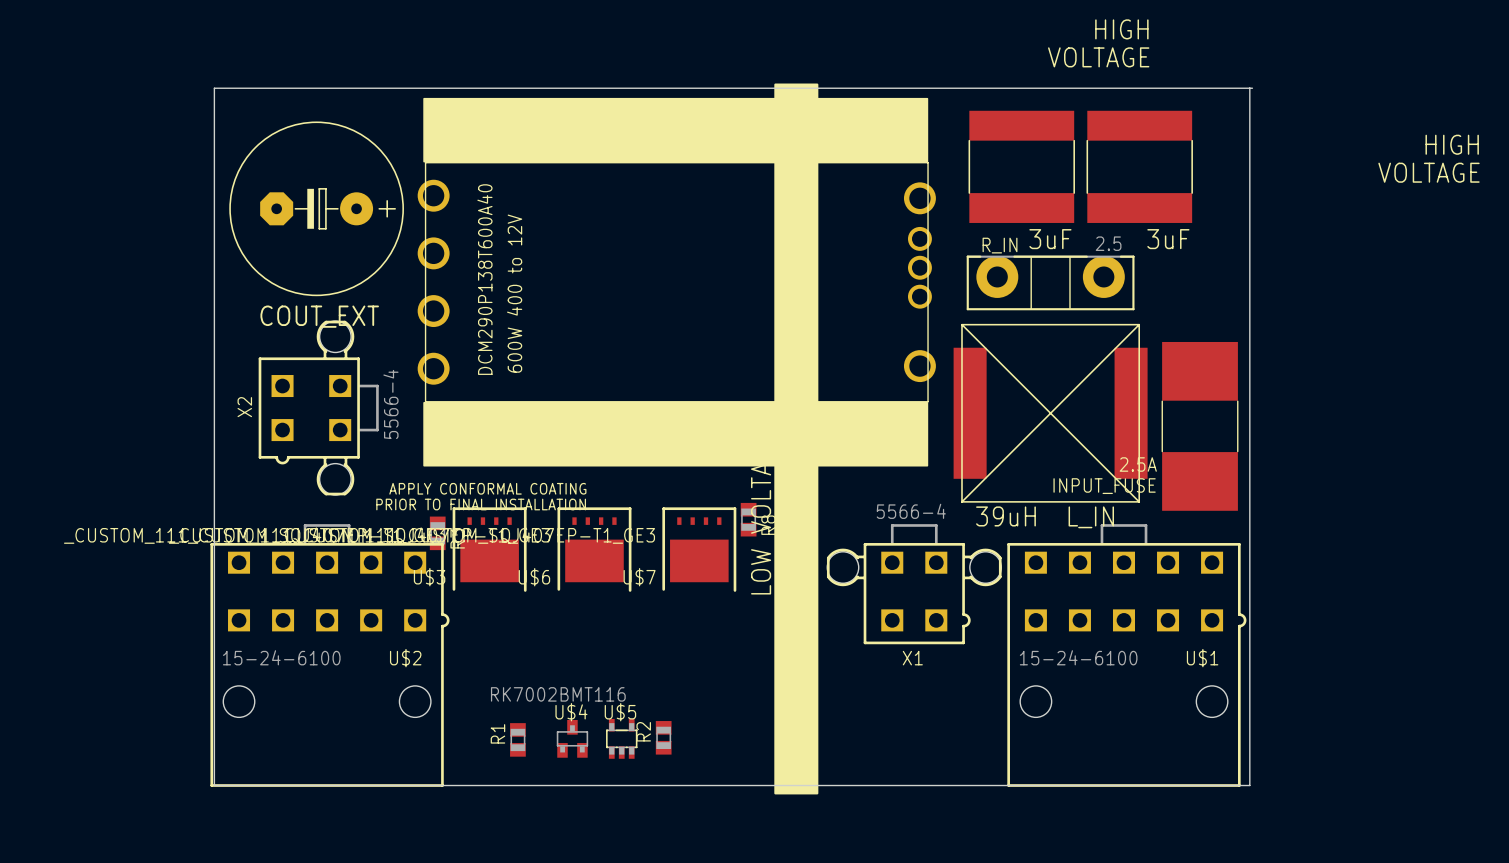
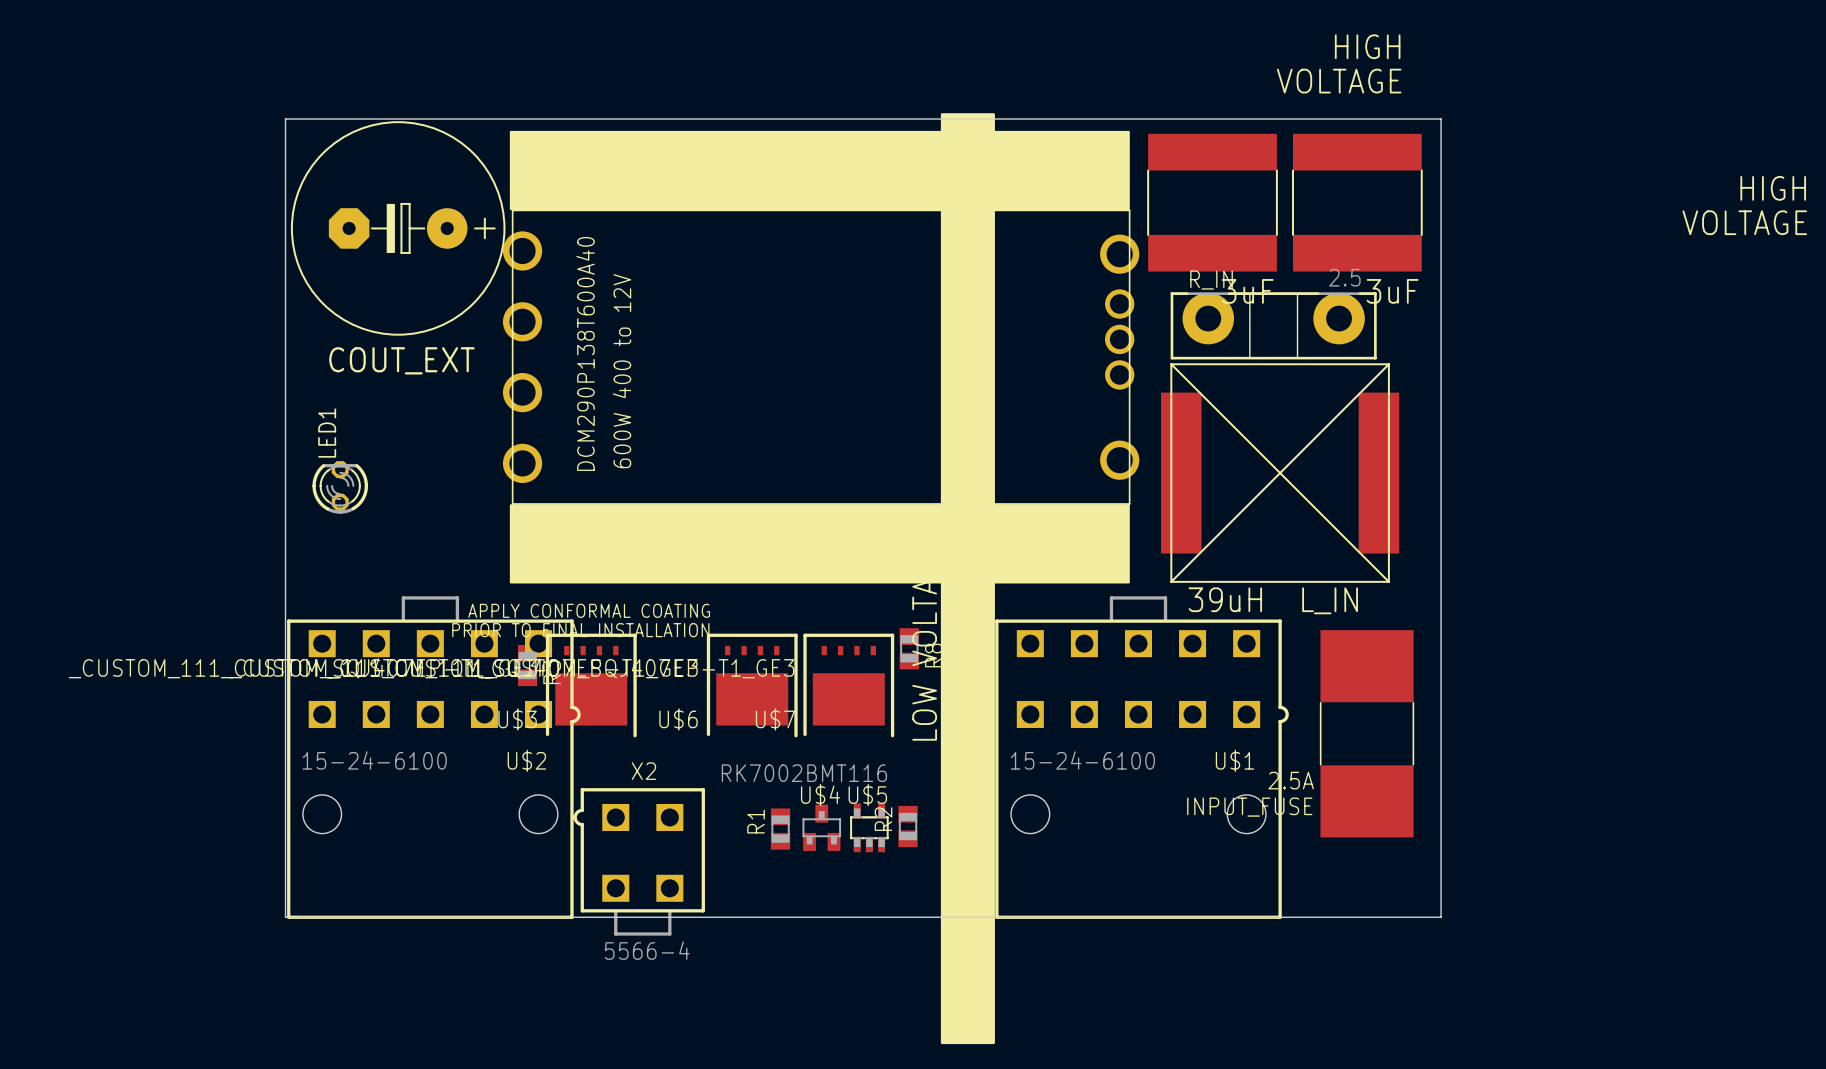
drawing: [774, 83, 819, 795] -> none
drawing: none -> [940, 113, 995, 1045]
board edge: (240, 88) (214, 88) (214, 785) (1249, 785) (1249, 88) -> (285, 119) (285, 917) (1441, 917) (1441, 119)
board edge: (1181, 88) (1252, 88) -> none
part position: (1021, 166) -> (1212, 202)
part position: (1139, 166) -> (1357, 202)
COUT_EXT position: (316, 208) -> (398, 228)
R_IN position: (1050, 282) -> (1273, 325)
X2 footprint: [258, 320, 379, 496] -> [573, 788, 705, 936]
LED1: none -> (340, 487)
X2 value position: 5566-4 (390, 404) -> 5566-4 (647, 950)
X2 name position: X2 (244, 407) -> X2 (643, 771)
L_IN position: (1050, 413) -> (1280, 473)
INPUT_FUSE position: (1200, 426) -> (1367, 733)
U$6 position: (594, 549) -> (752, 685)
X1: 5566-4 (914, 584) -> none
U$2 position: (329, 655) -> (433, 757)
U$1 position: (1126, 655) -> (1142, 757)
R2 position: (663, 737) -> (908, 826)
U$4 position: (572, 738) -> (821, 827)
U$5 position: (621, 738) -> (869, 827)
R1 position: (517, 739) -> (780, 829)

